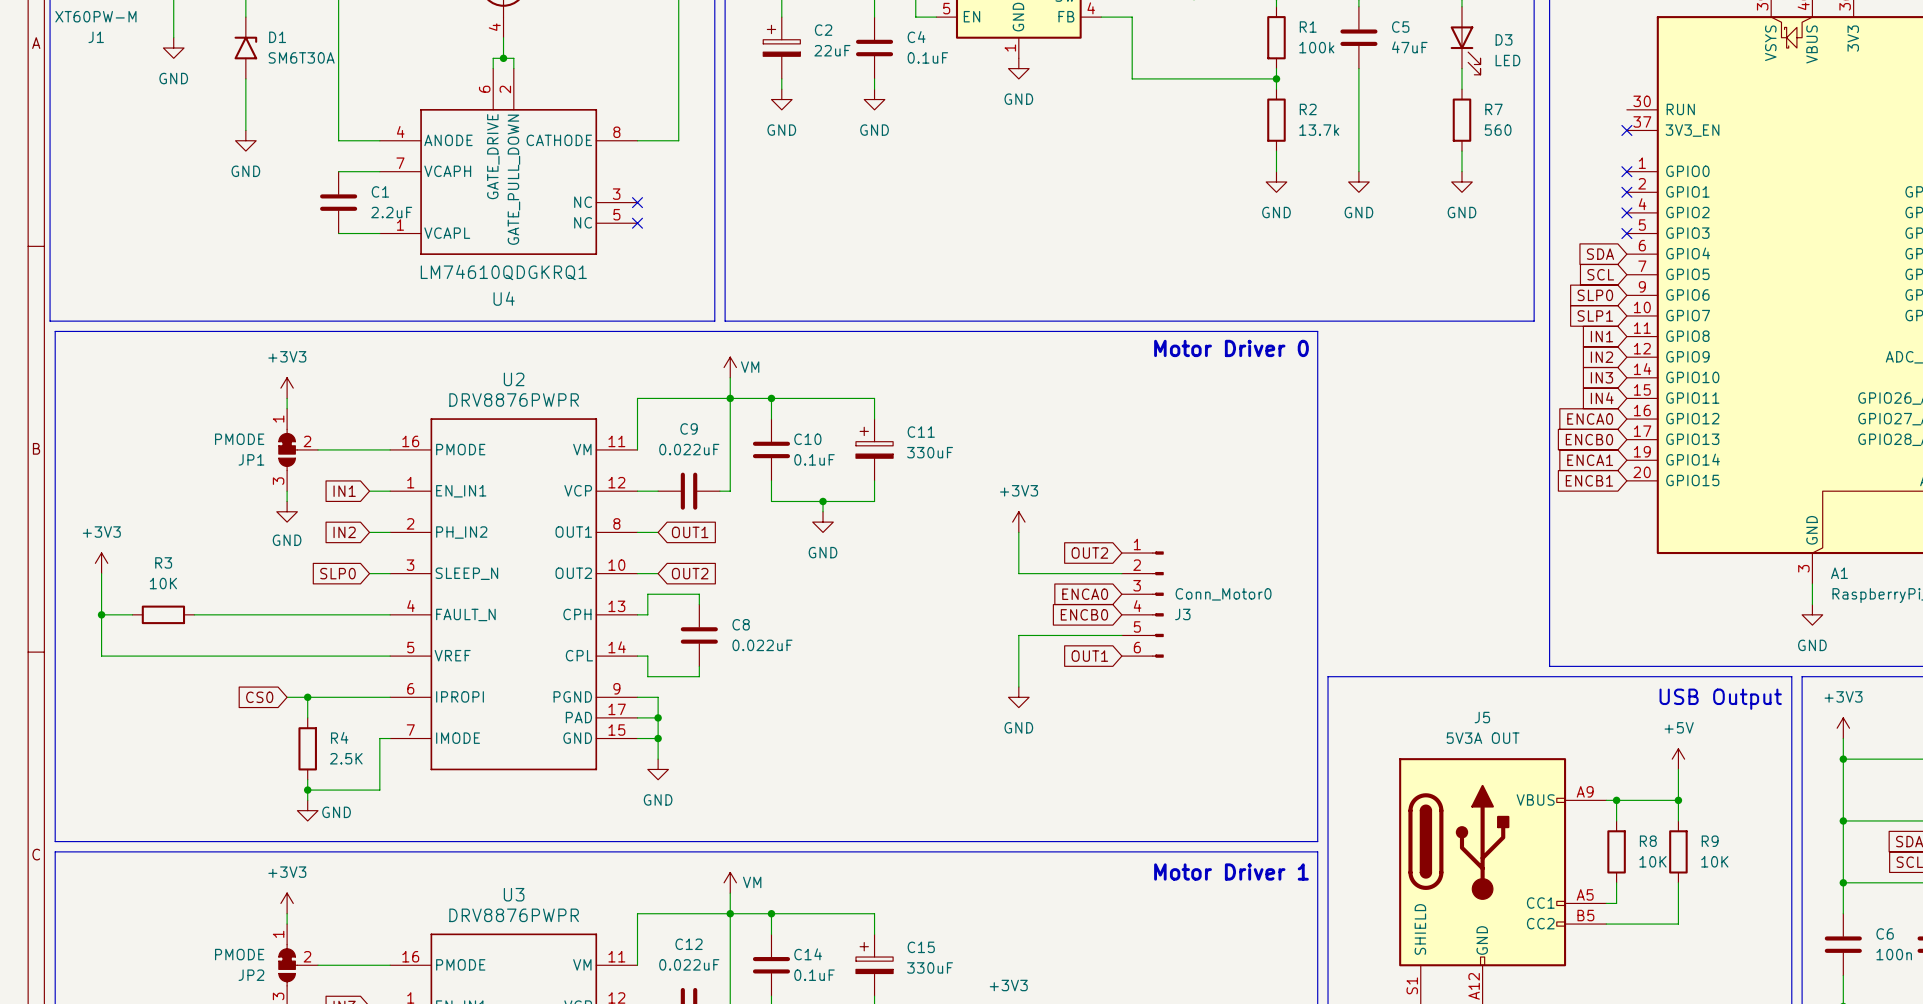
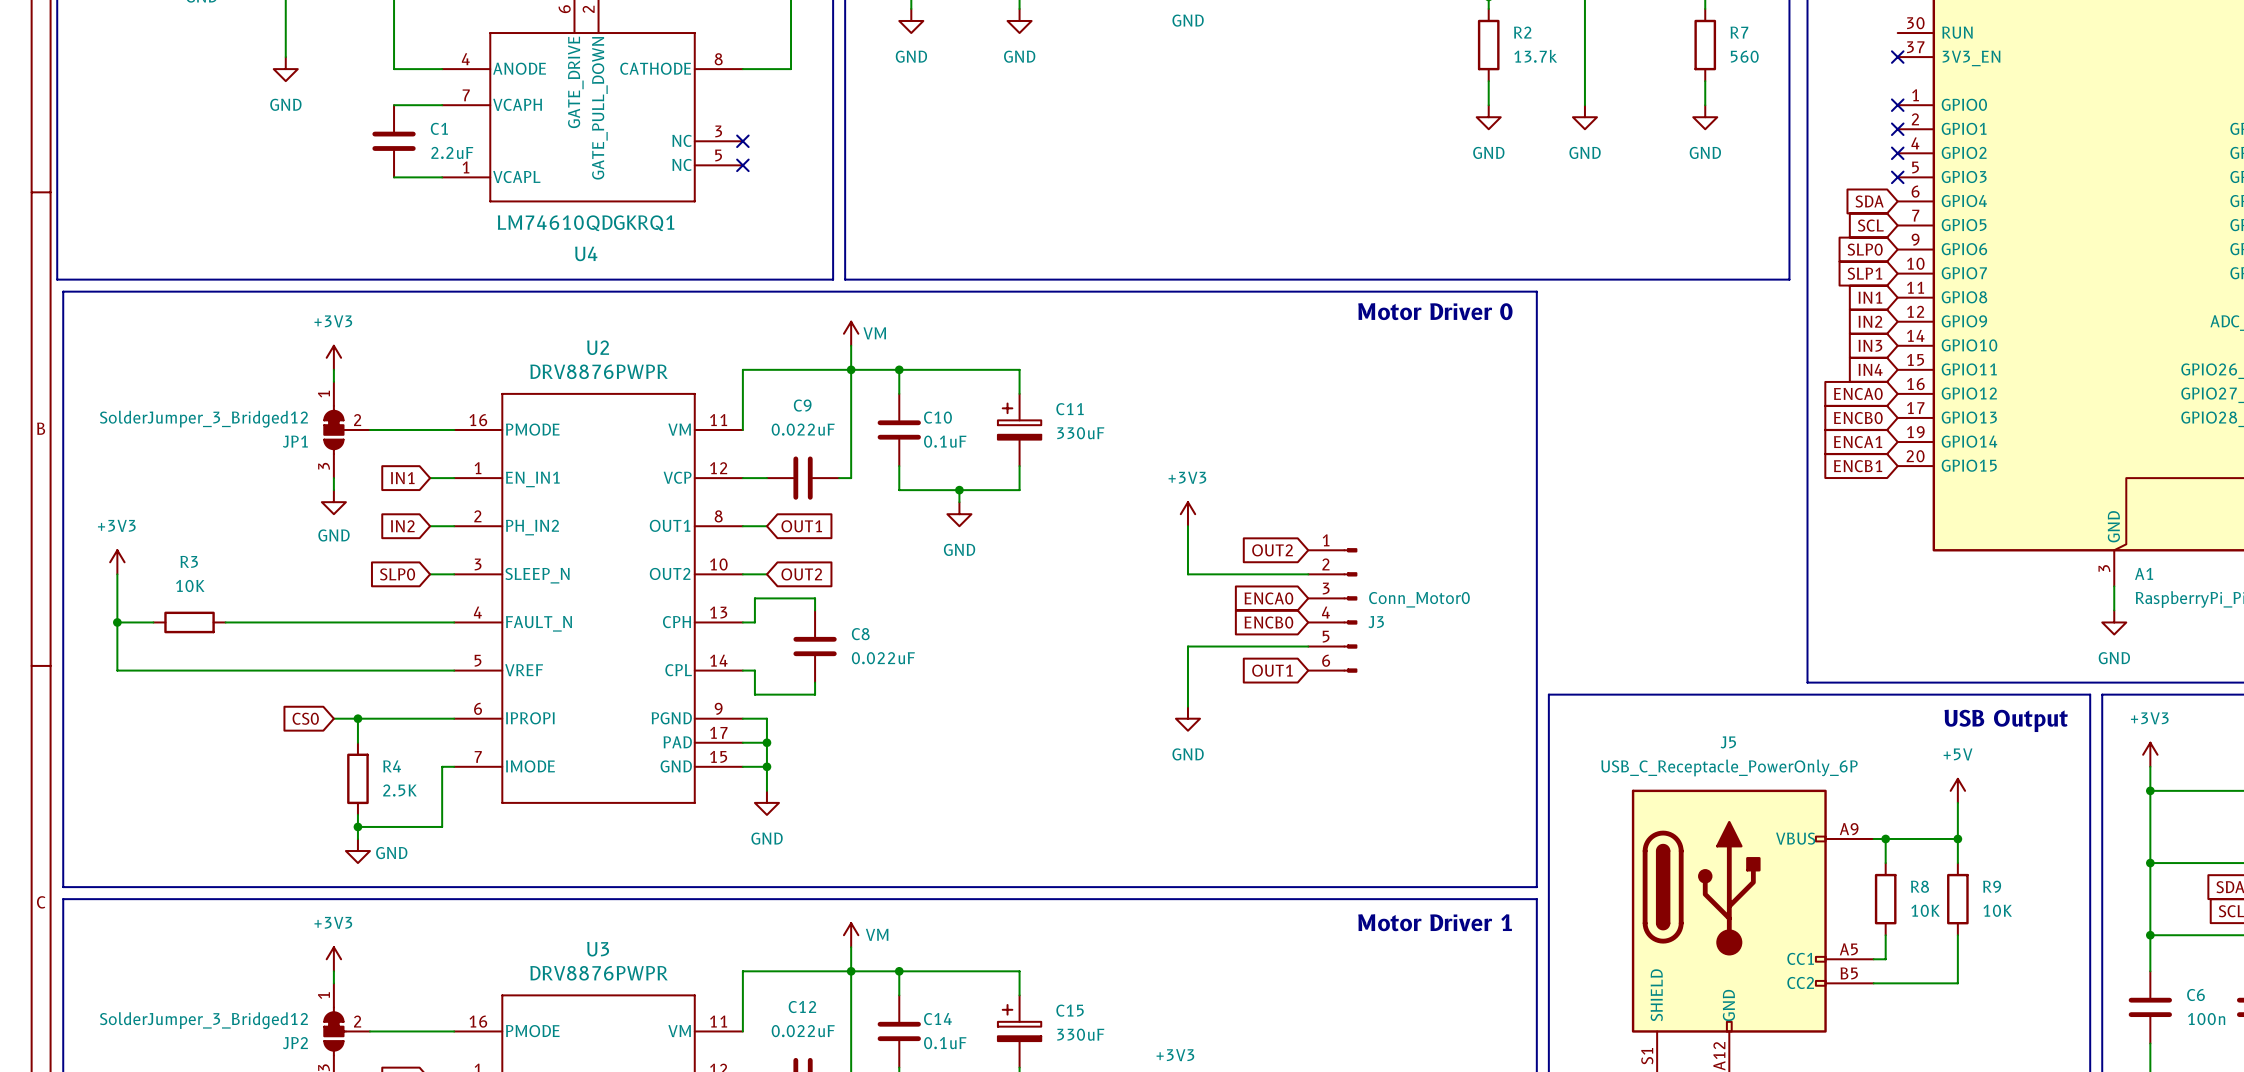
JP1 value: PMODE (239, 439) -> SolderJumper_3_Bridged12 (203, 419)
J5 value: 5V3A OUT (1483, 738) -> USB_C_Receptacle_PowerOnly_6P (1729, 767)
JP2 value: PMODE (239, 954) -> SolderJumper_3_Bridged12 (203, 1020)

